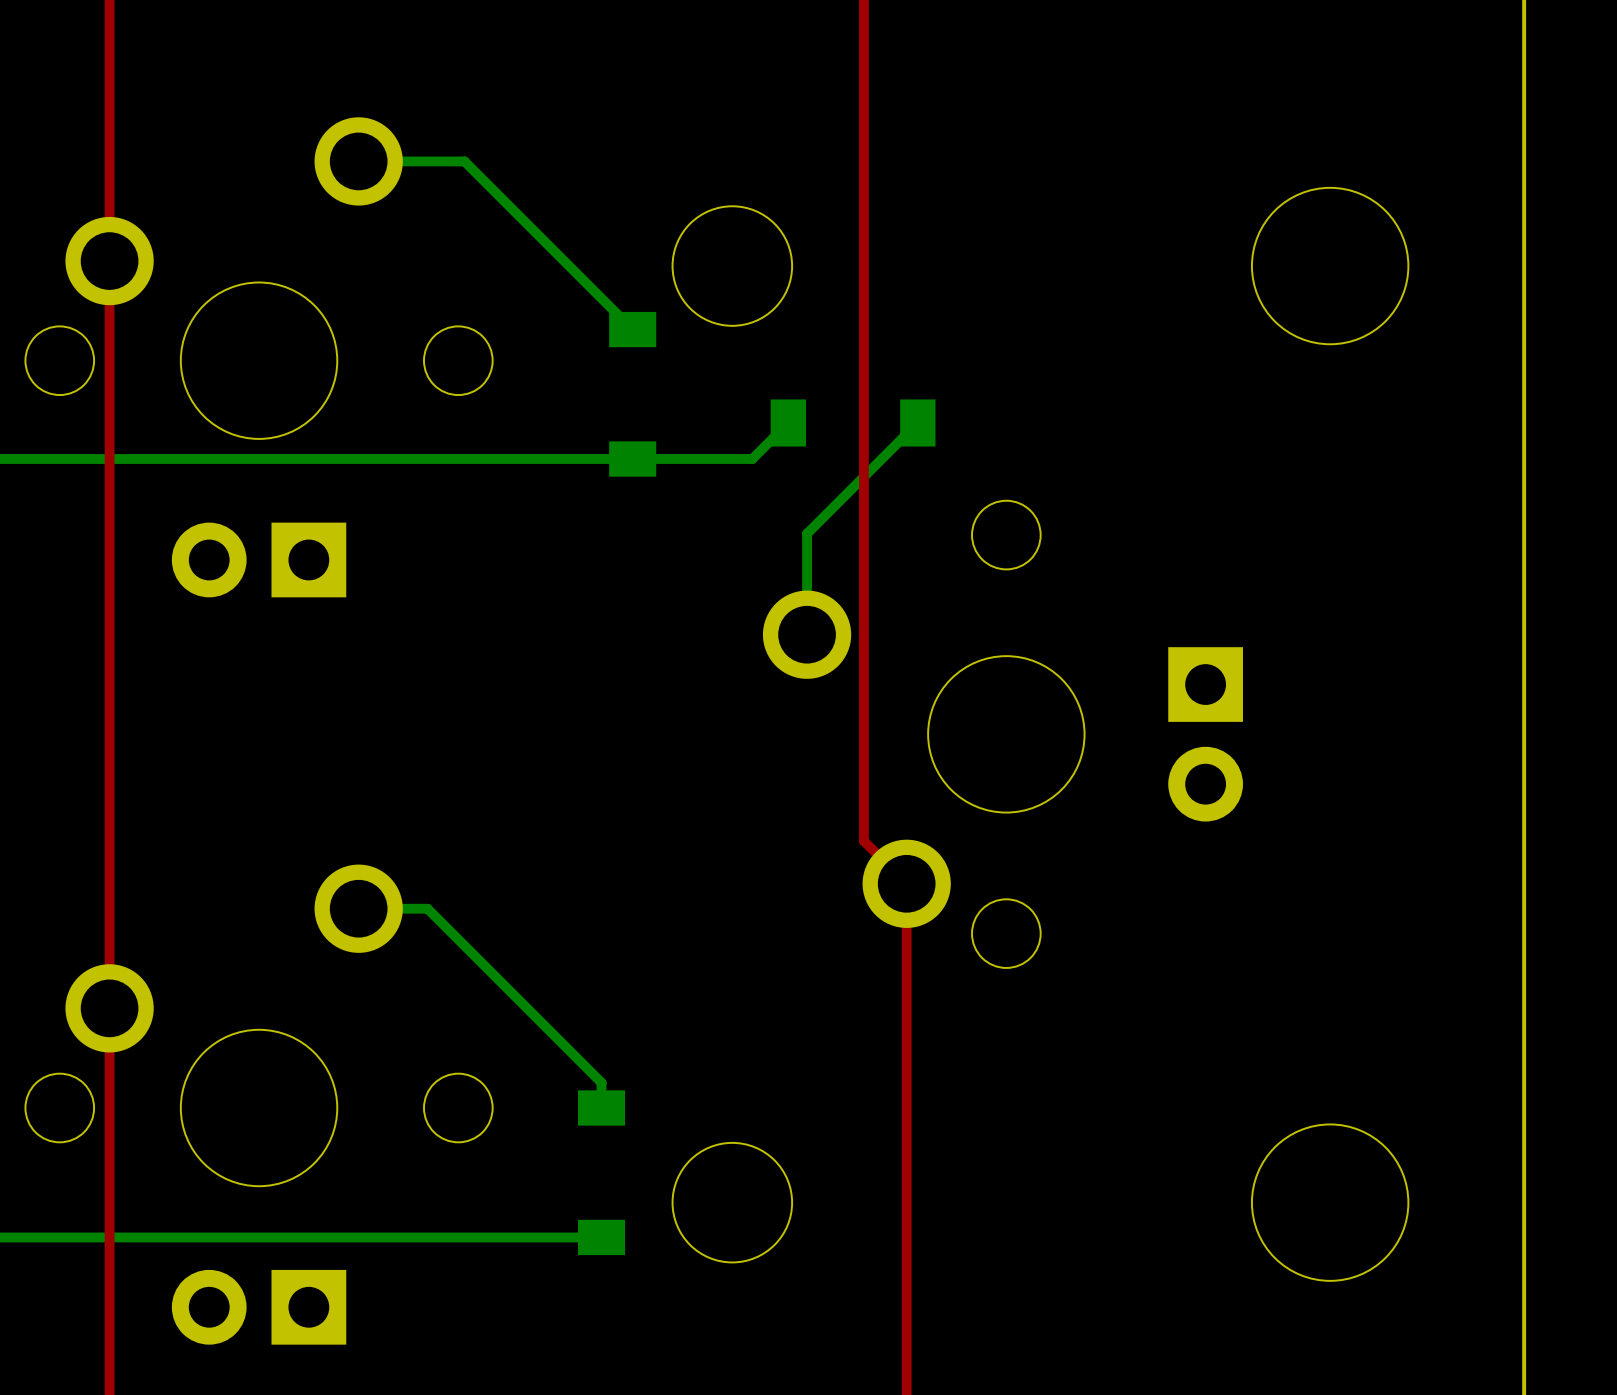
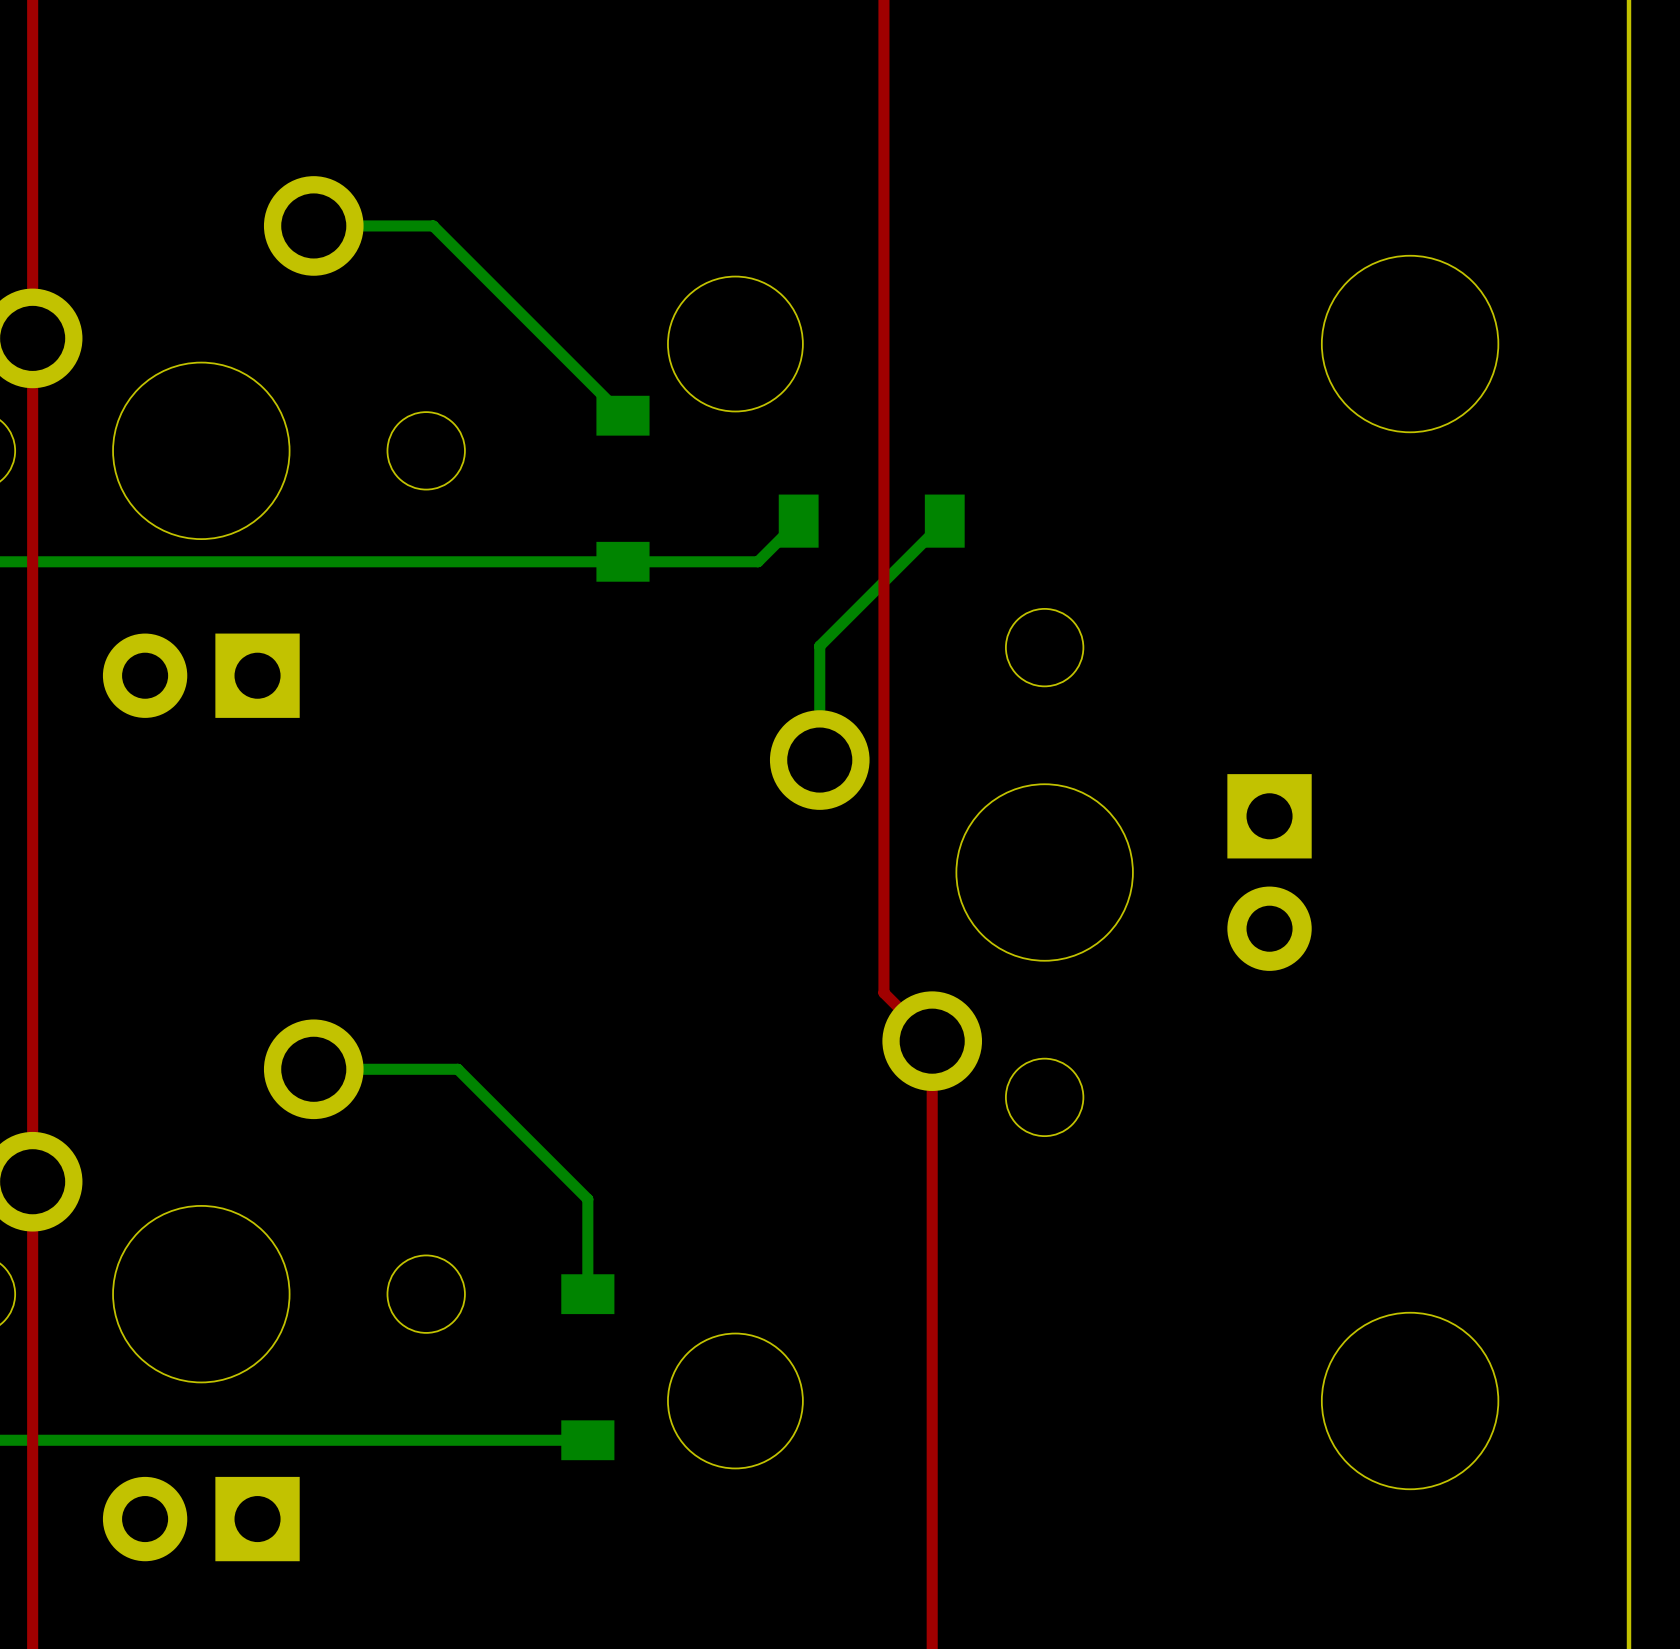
bottom track: (427, 908) (601, 1082) -> (391, 1069) (457, 1069) (587, 1199) (587, 1265)

